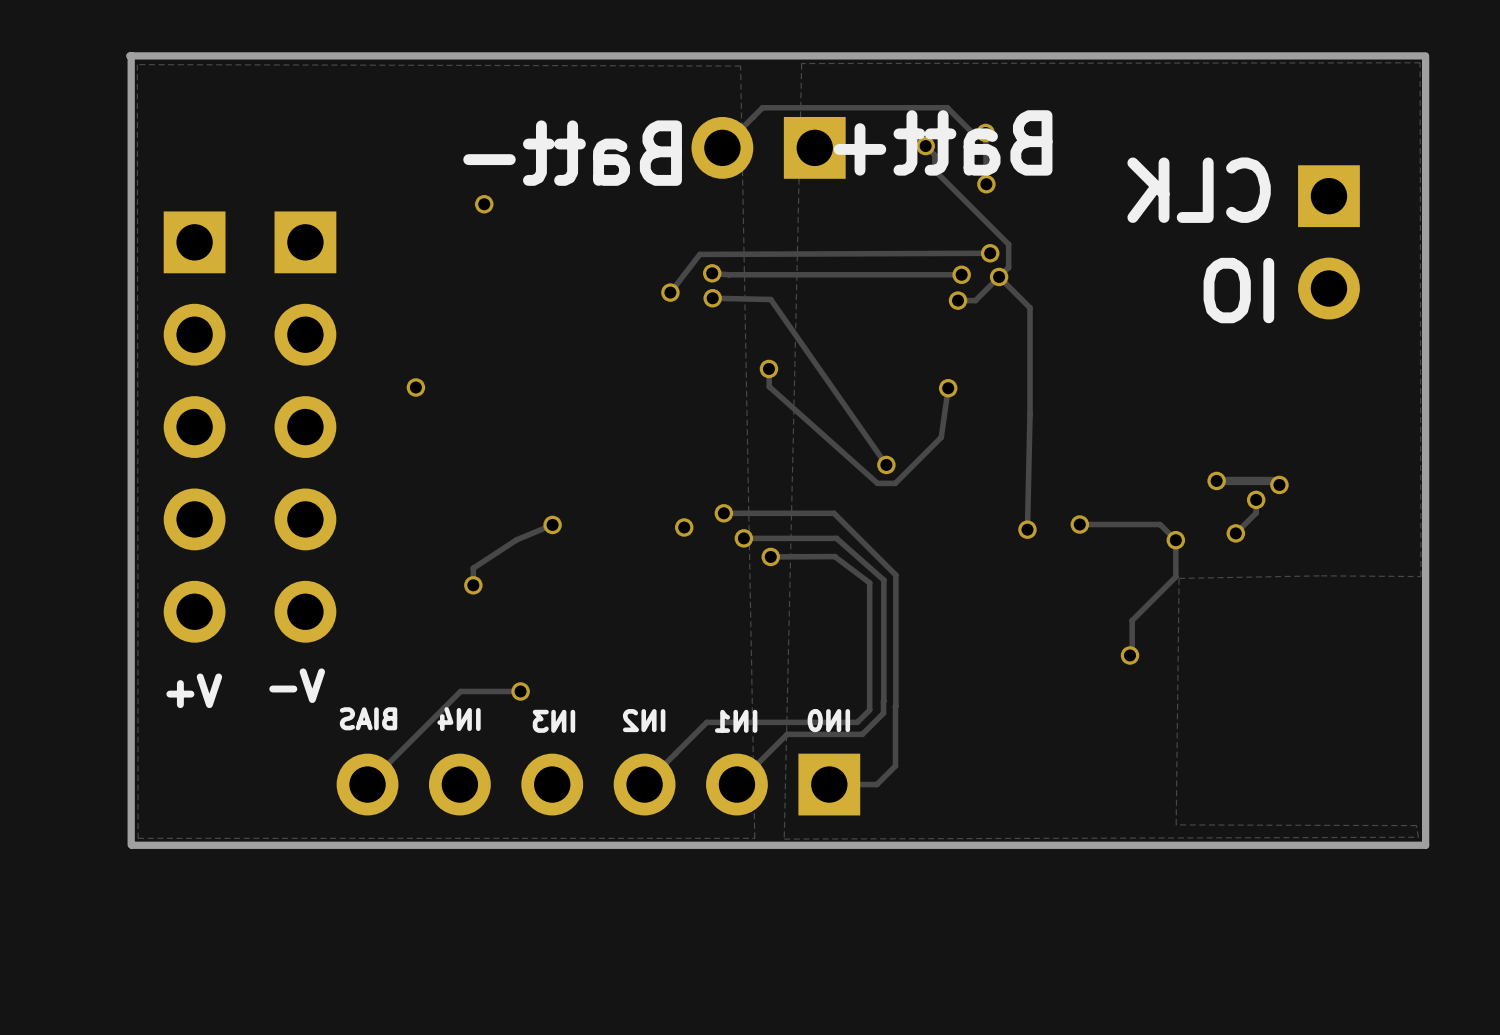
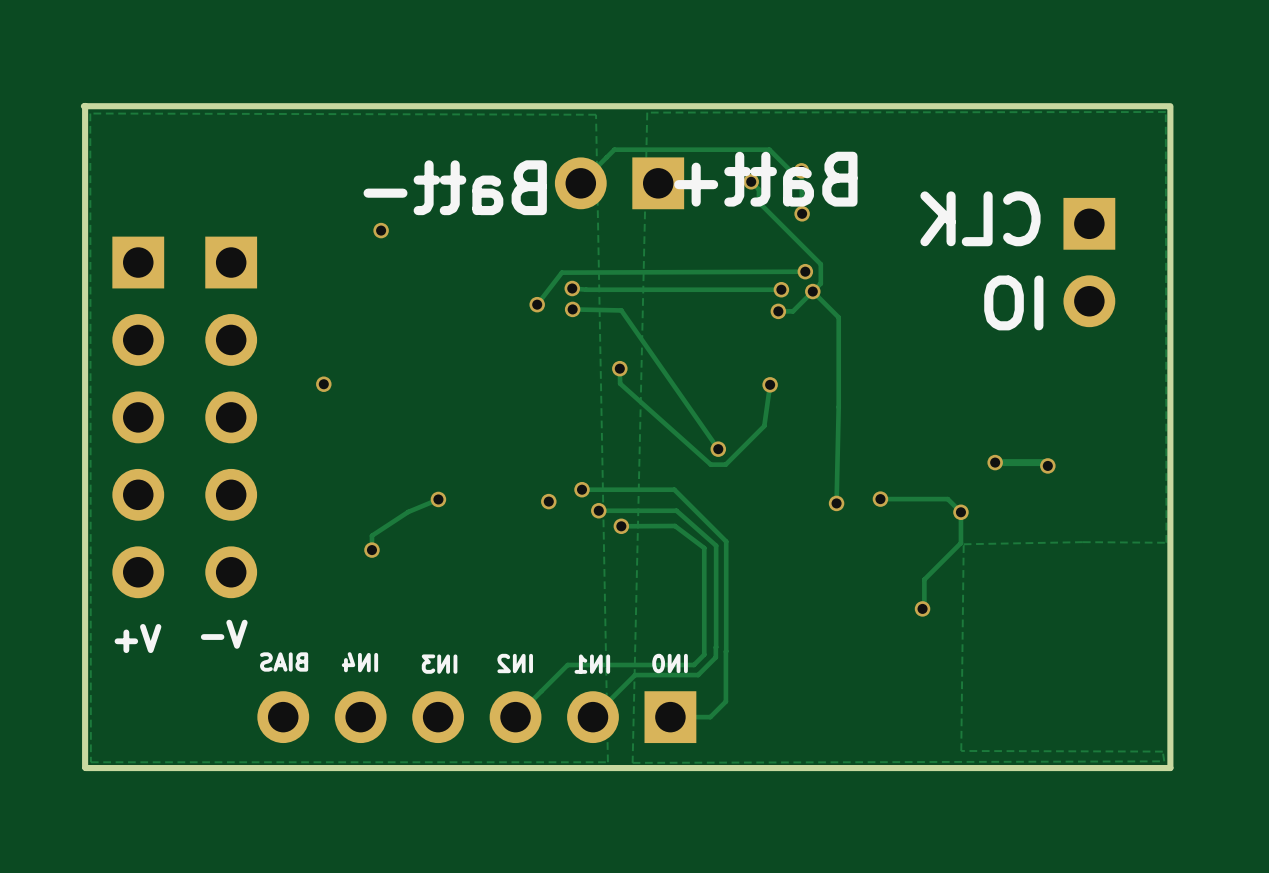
track: (1256, 499) (1256, 513) (1235, 533) -> none
via: (1256, 499) -> none
via: (1235, 533) -> none
track: (520, 691) (460, 691) (367, 784) -> none
via: (520, 691) -> none

